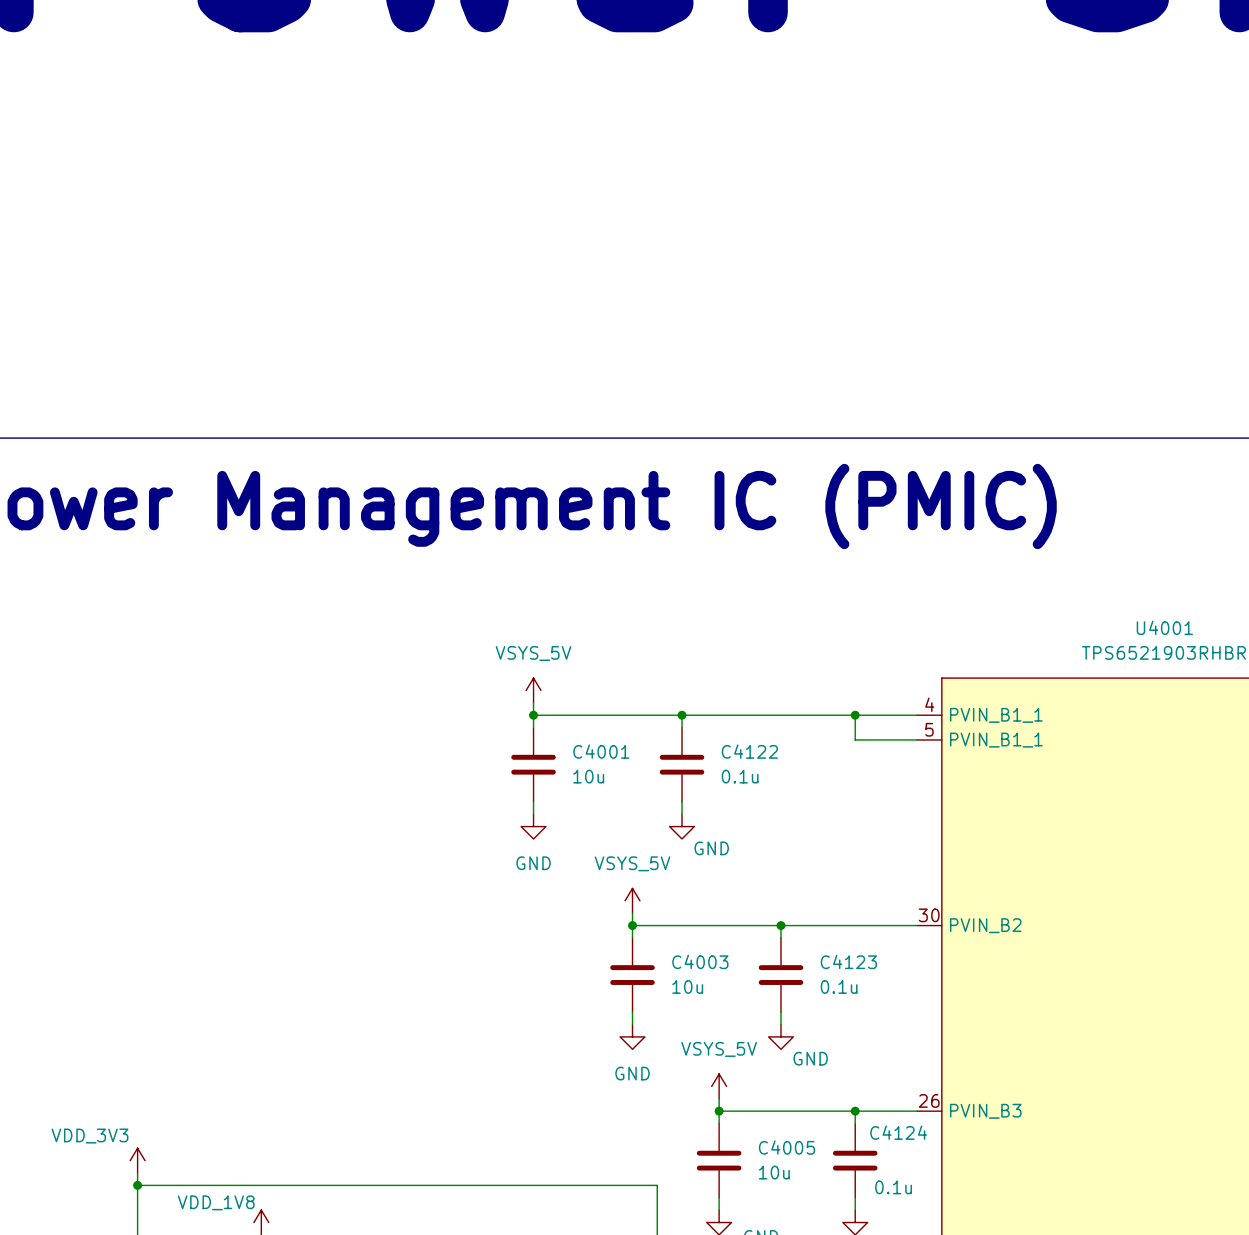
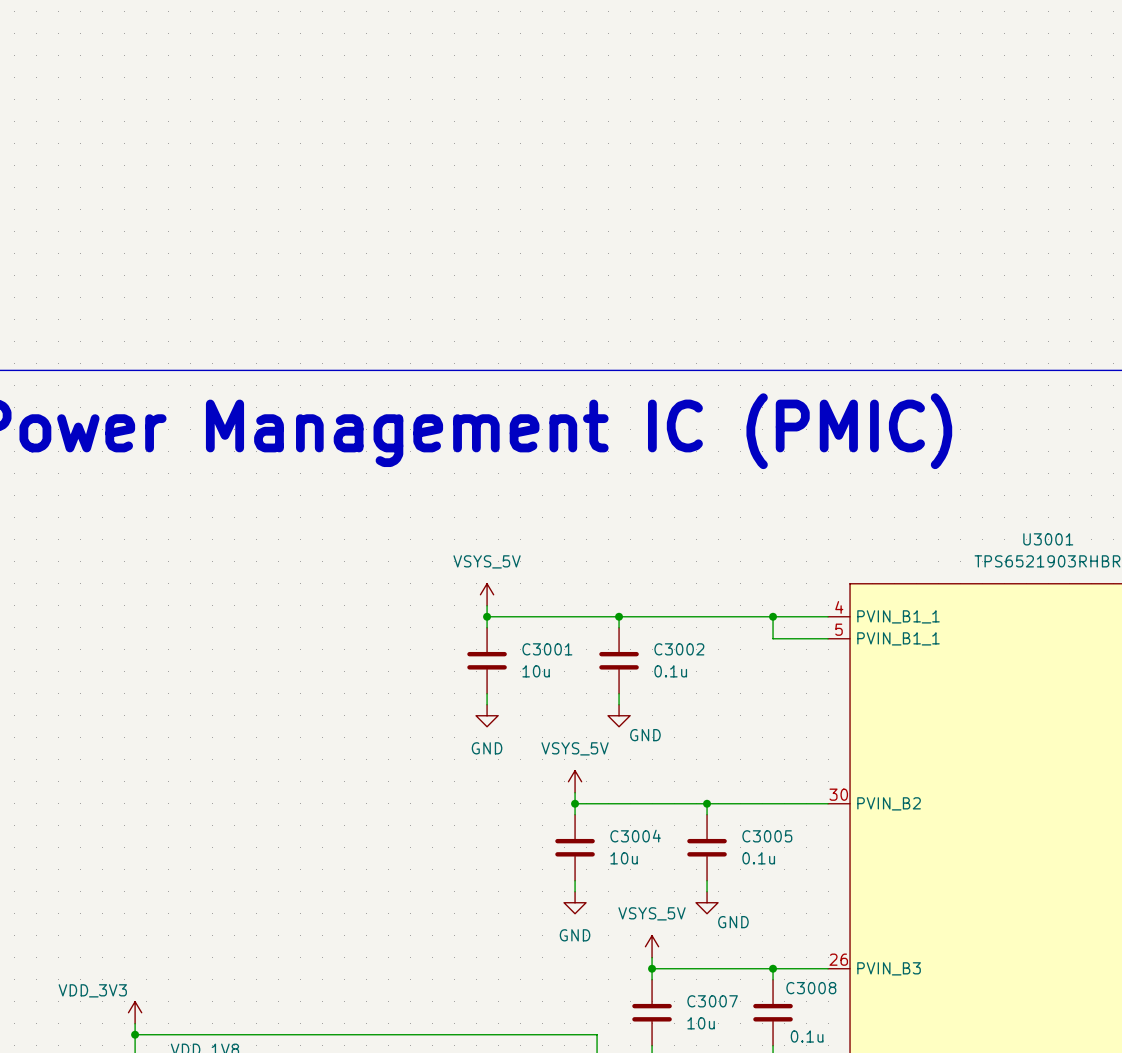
U4001 name: U4001 (1164, 627) -> U3001 (1048, 539)
C4001 name: C4001 (601, 751) -> C3001 (547, 649)
C4122 name: C4122 (749, 751) -> C3002 (679, 649)
C4003 name: C4003 (700, 961) -> C3004 (635, 836)
C4123 name: C4123 (848, 961) -> C3005 (767, 836)
C4124 name: C4124 (898, 1132) -> C3008 (811, 988)
C4005 name: C4005 (786, 1147) -> C3007 (712, 1001)

